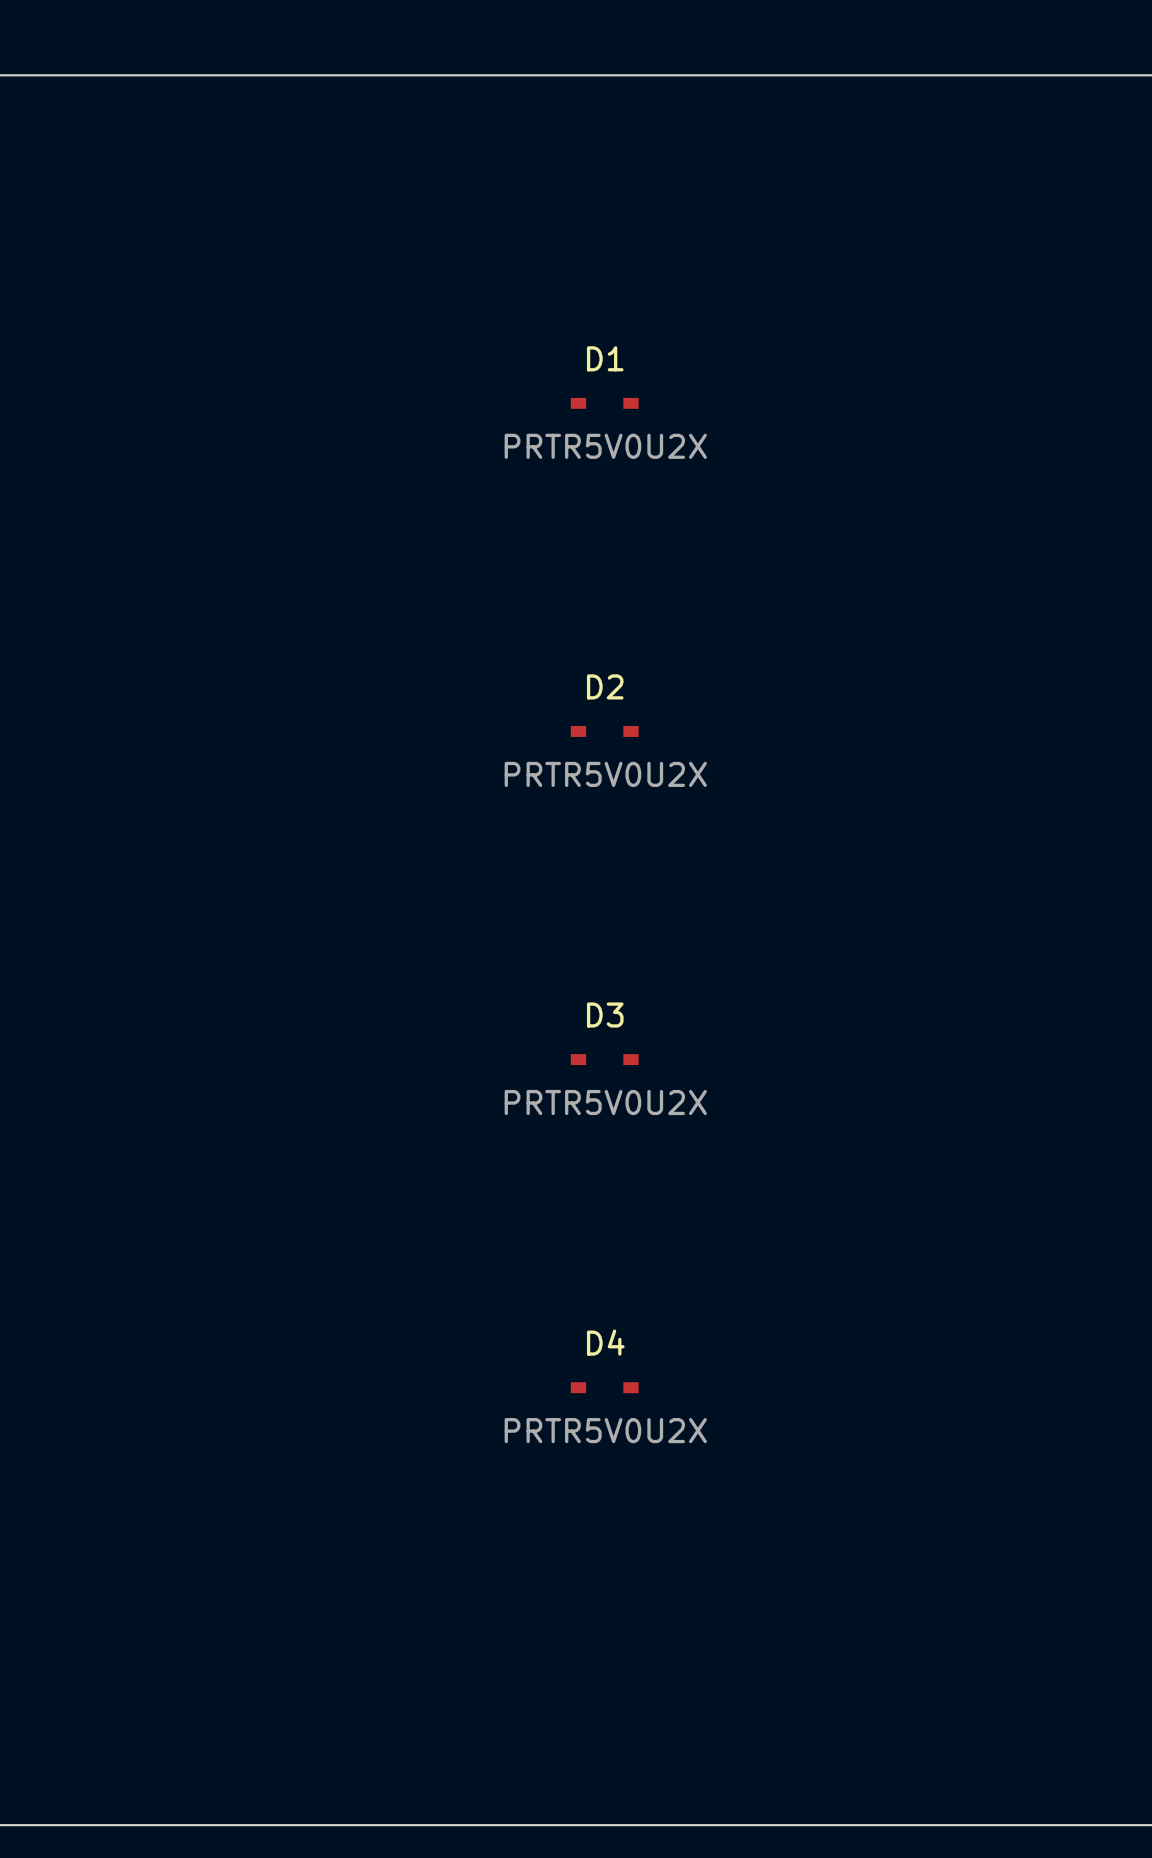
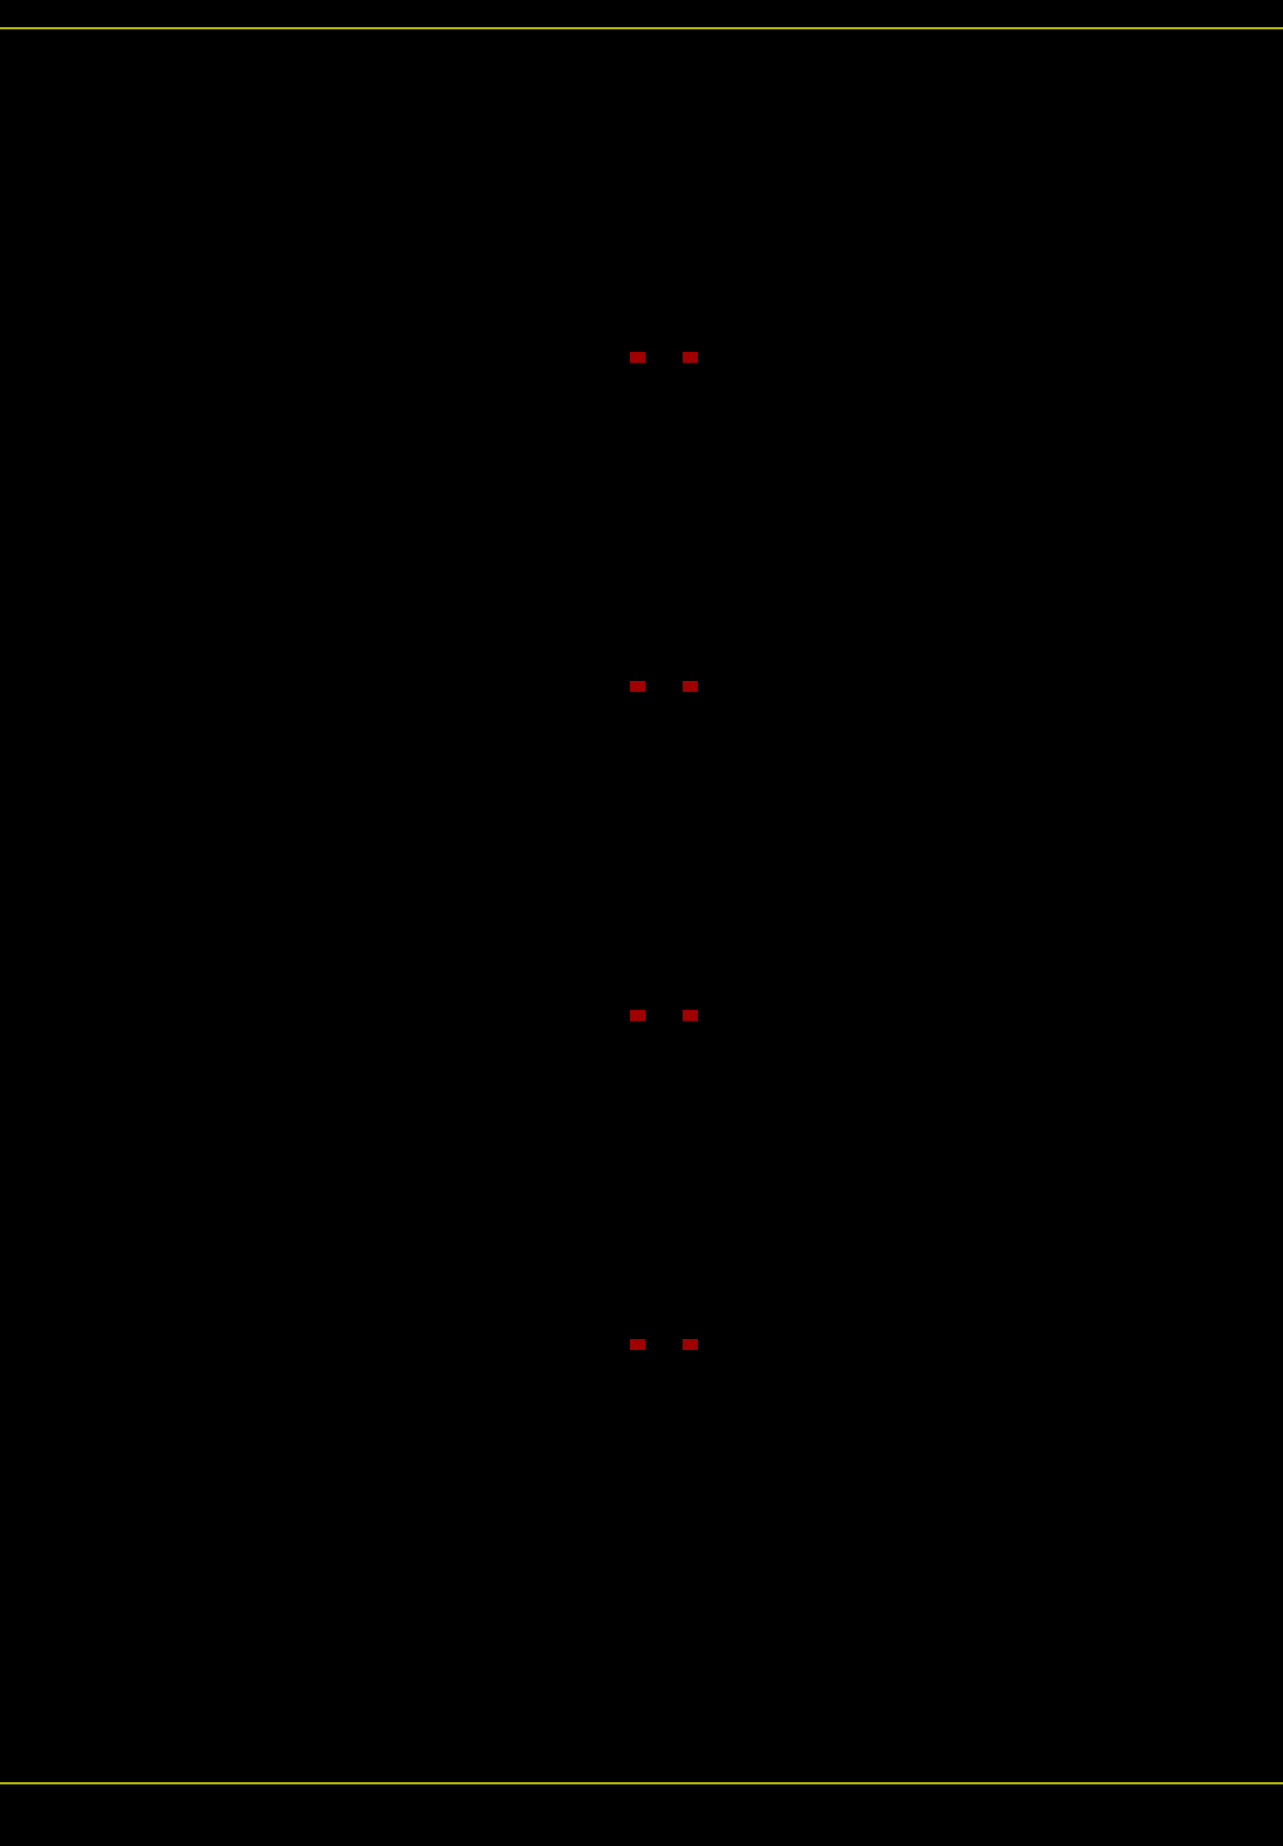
D1 name: D1 (605, 358) -> none
D1 value: PRTR5V0U2X (605, 446) -> none
D2 name: D2 (605, 686) -> none
D2 value: PRTR5V0U2X (605, 774) -> none
D3 name: D3 (605, 1015) -> none
D3 value: PRTR5V0U2X (605, 1102) -> none
D4 name: D4 (605, 1342) -> none
D4 value: PRTR5V0U2X (605, 1430) -> none

